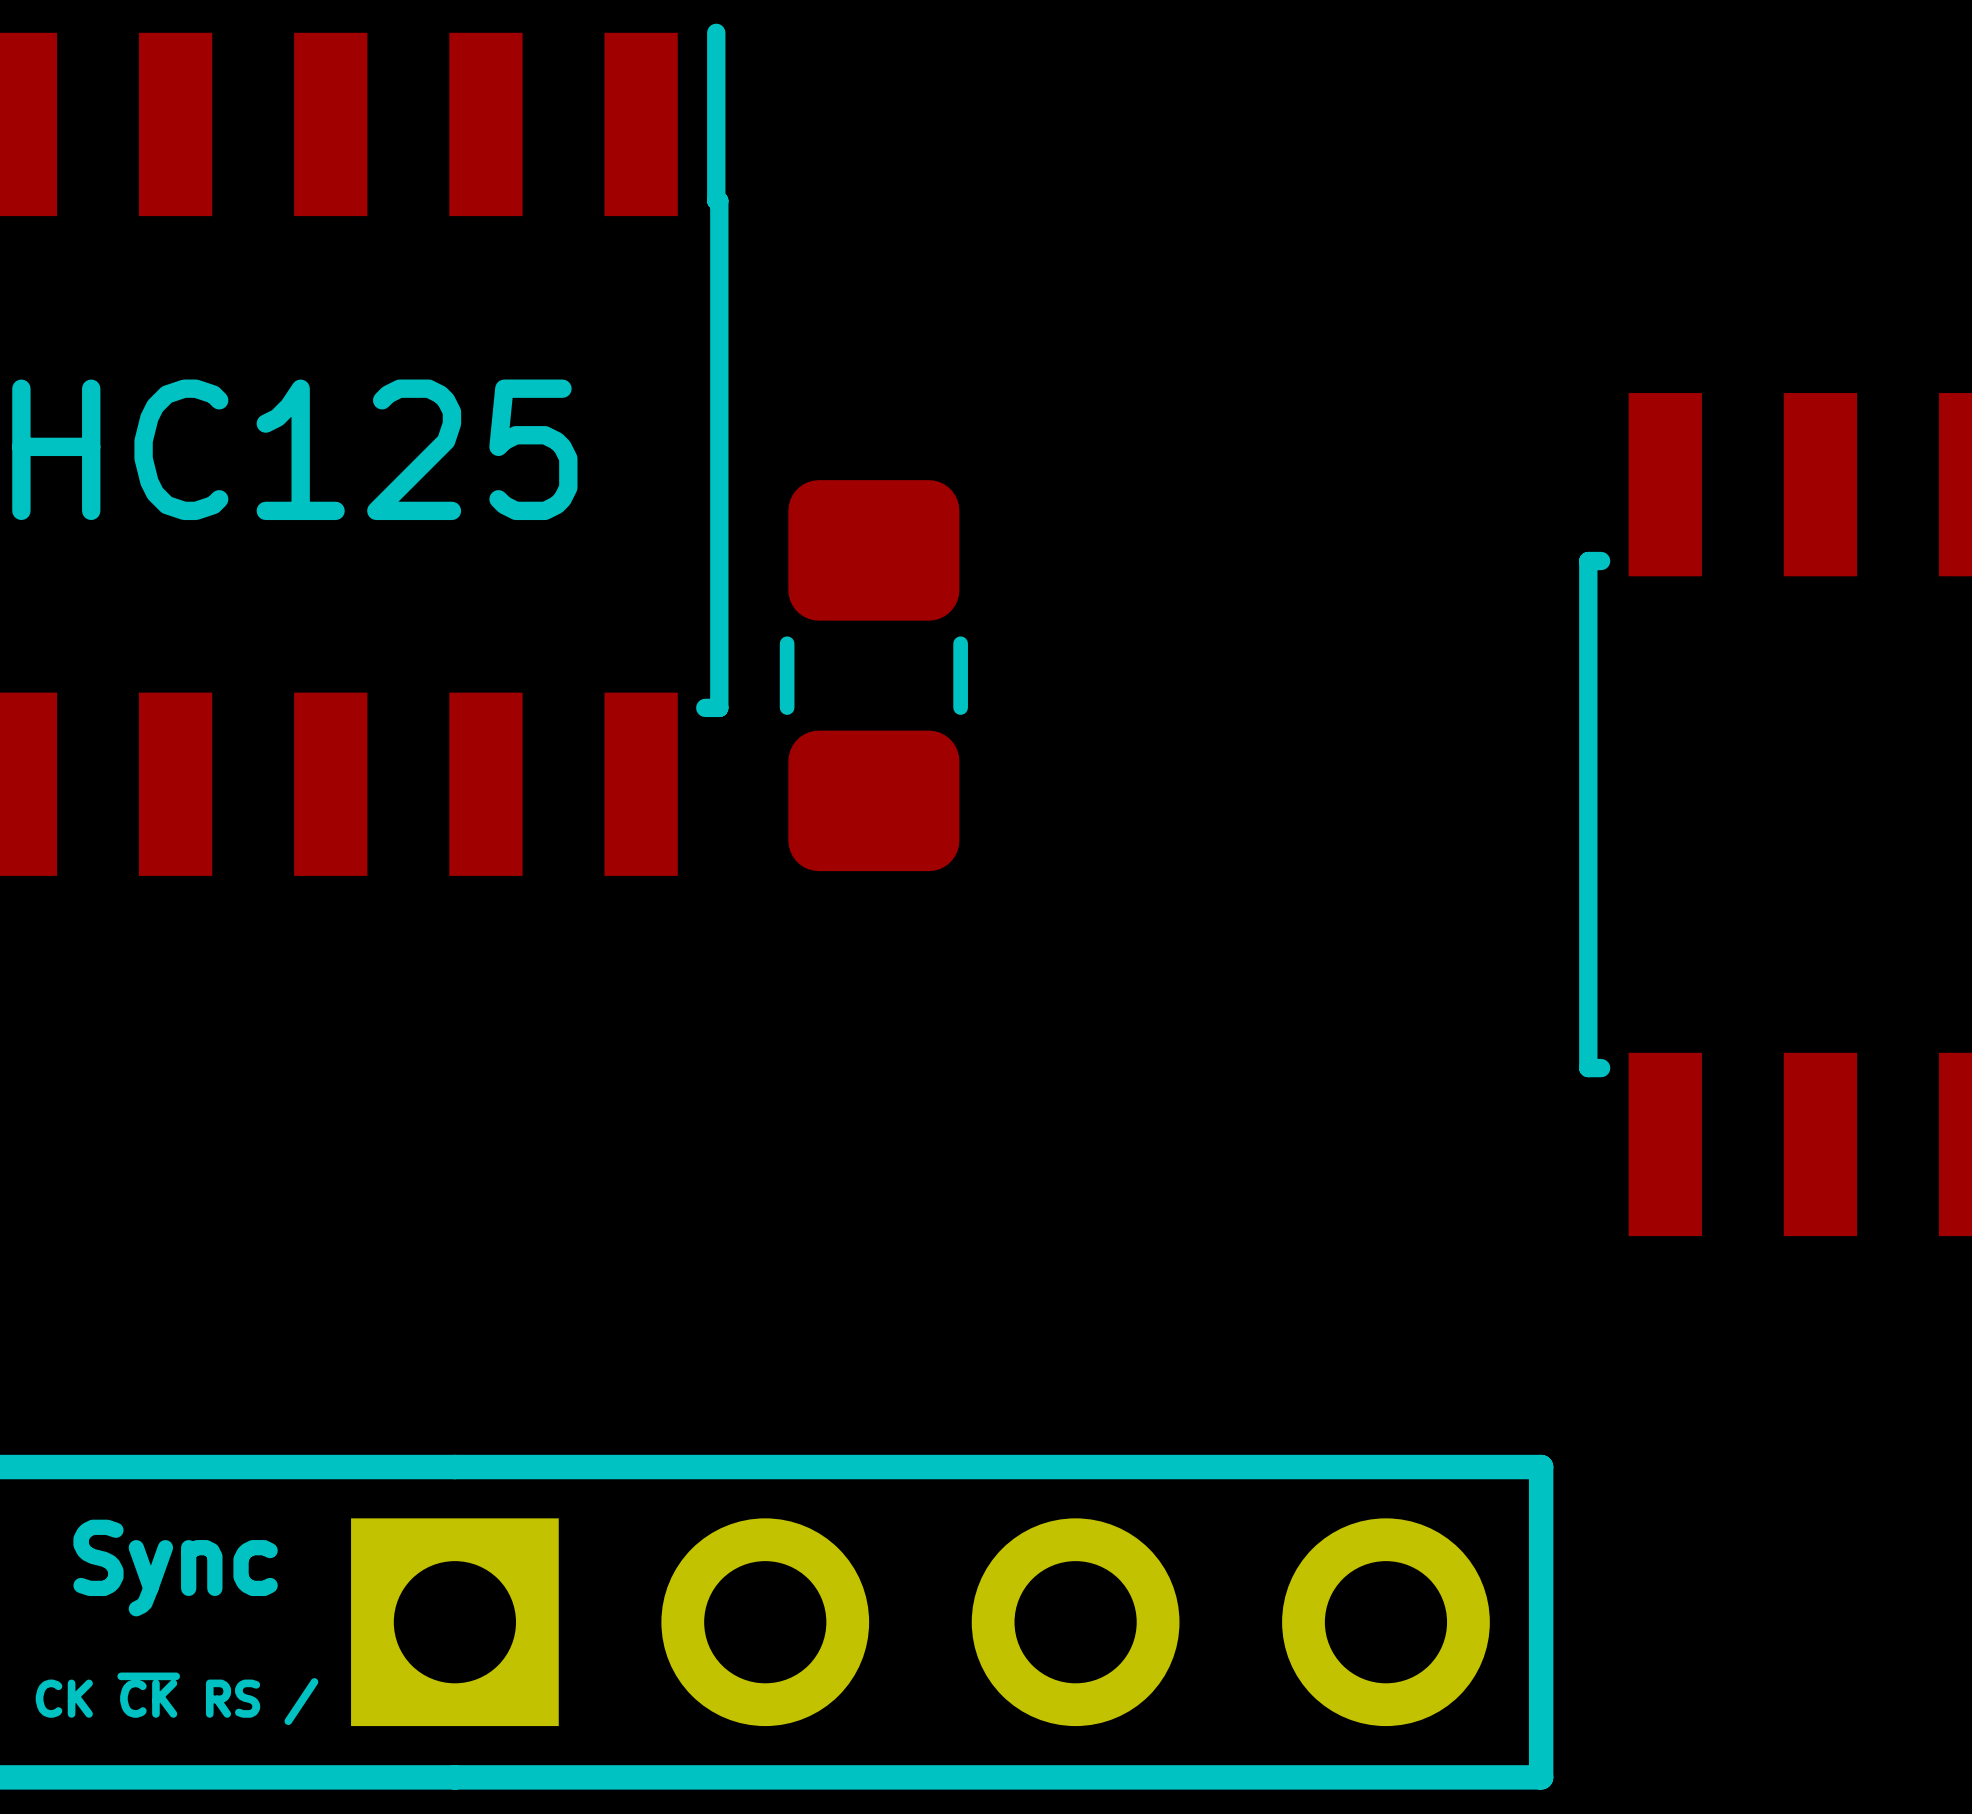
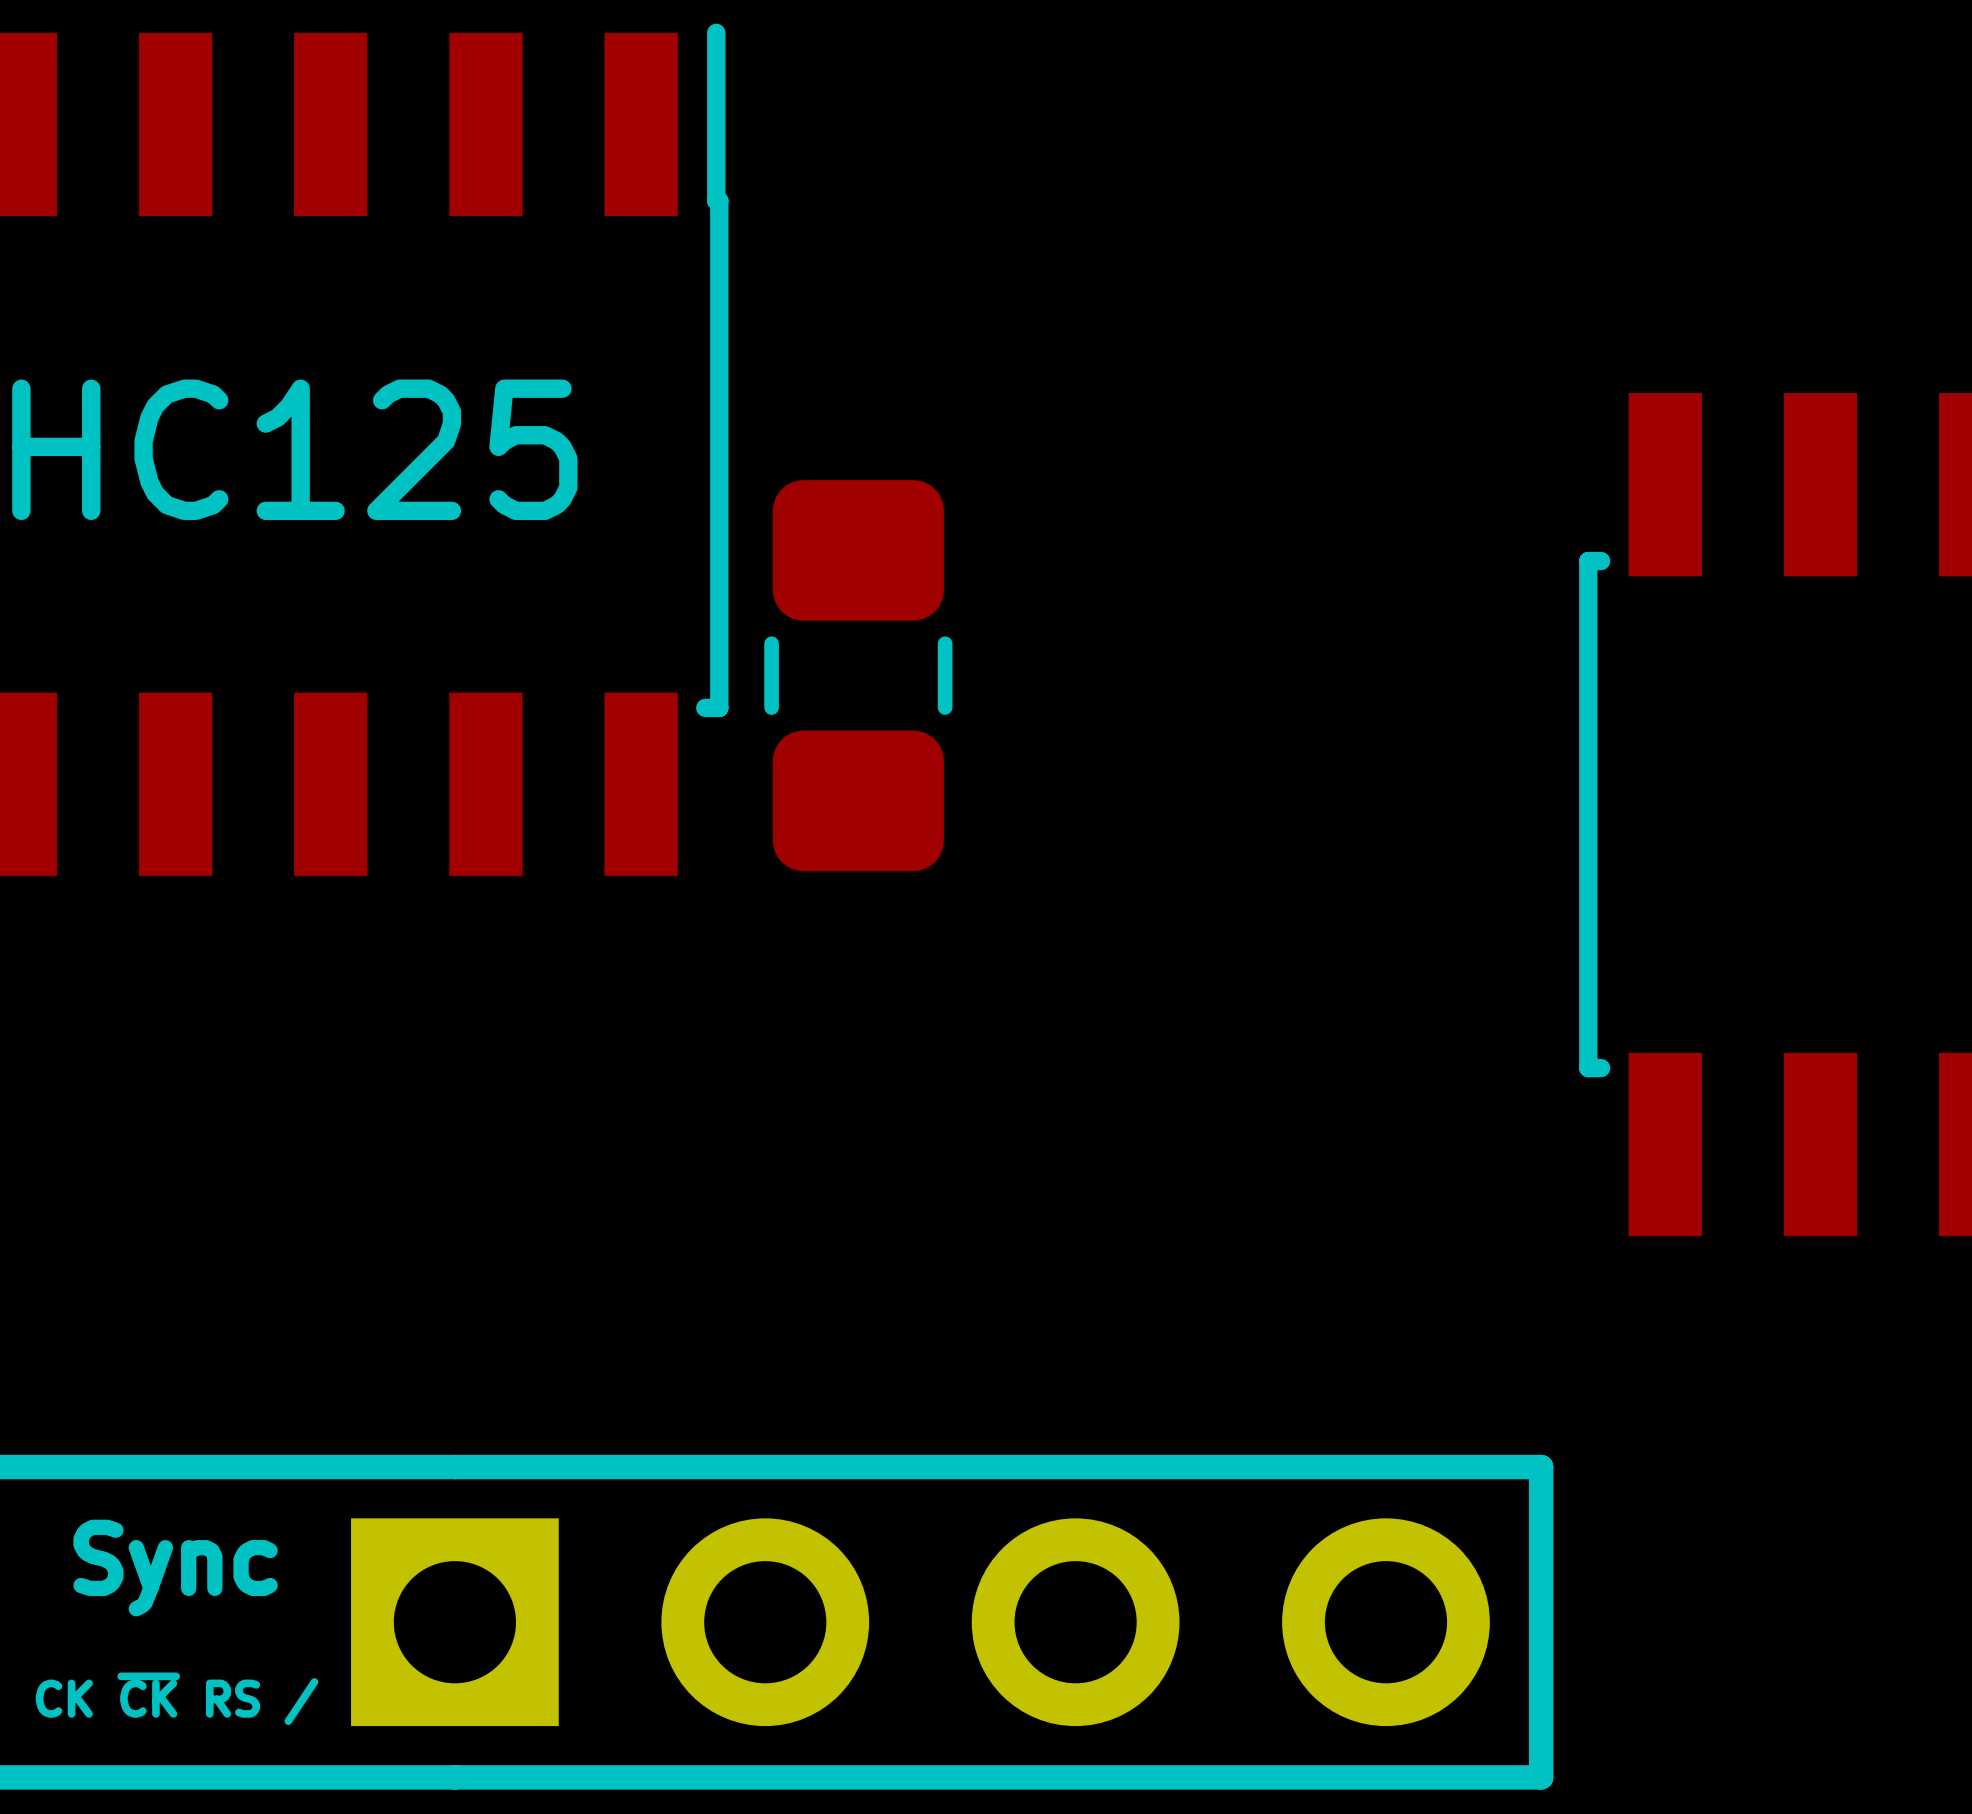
part position: (873, 675) -> (858, 675)

